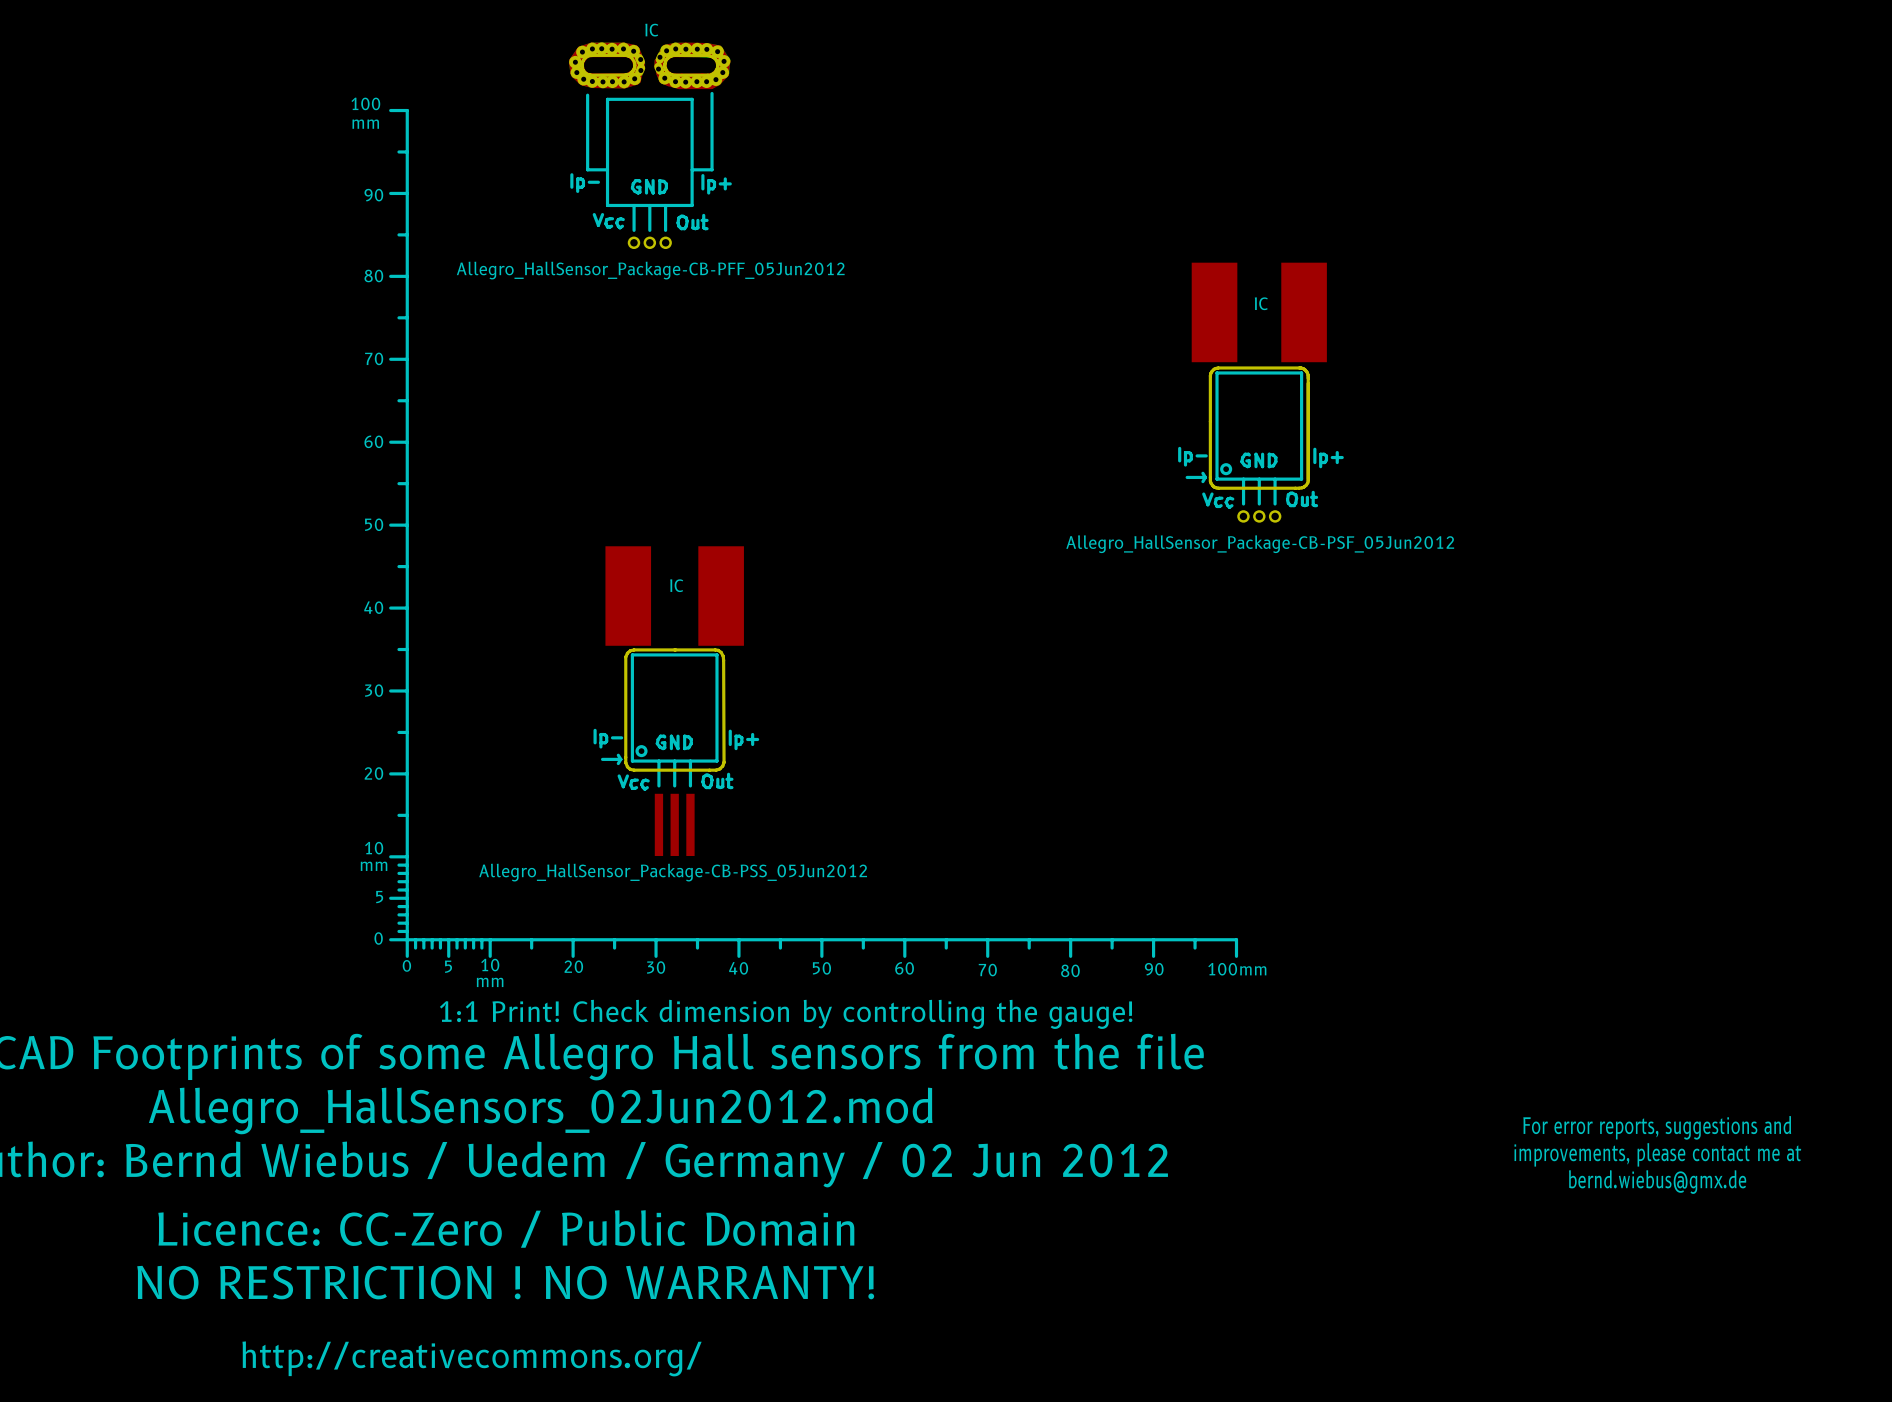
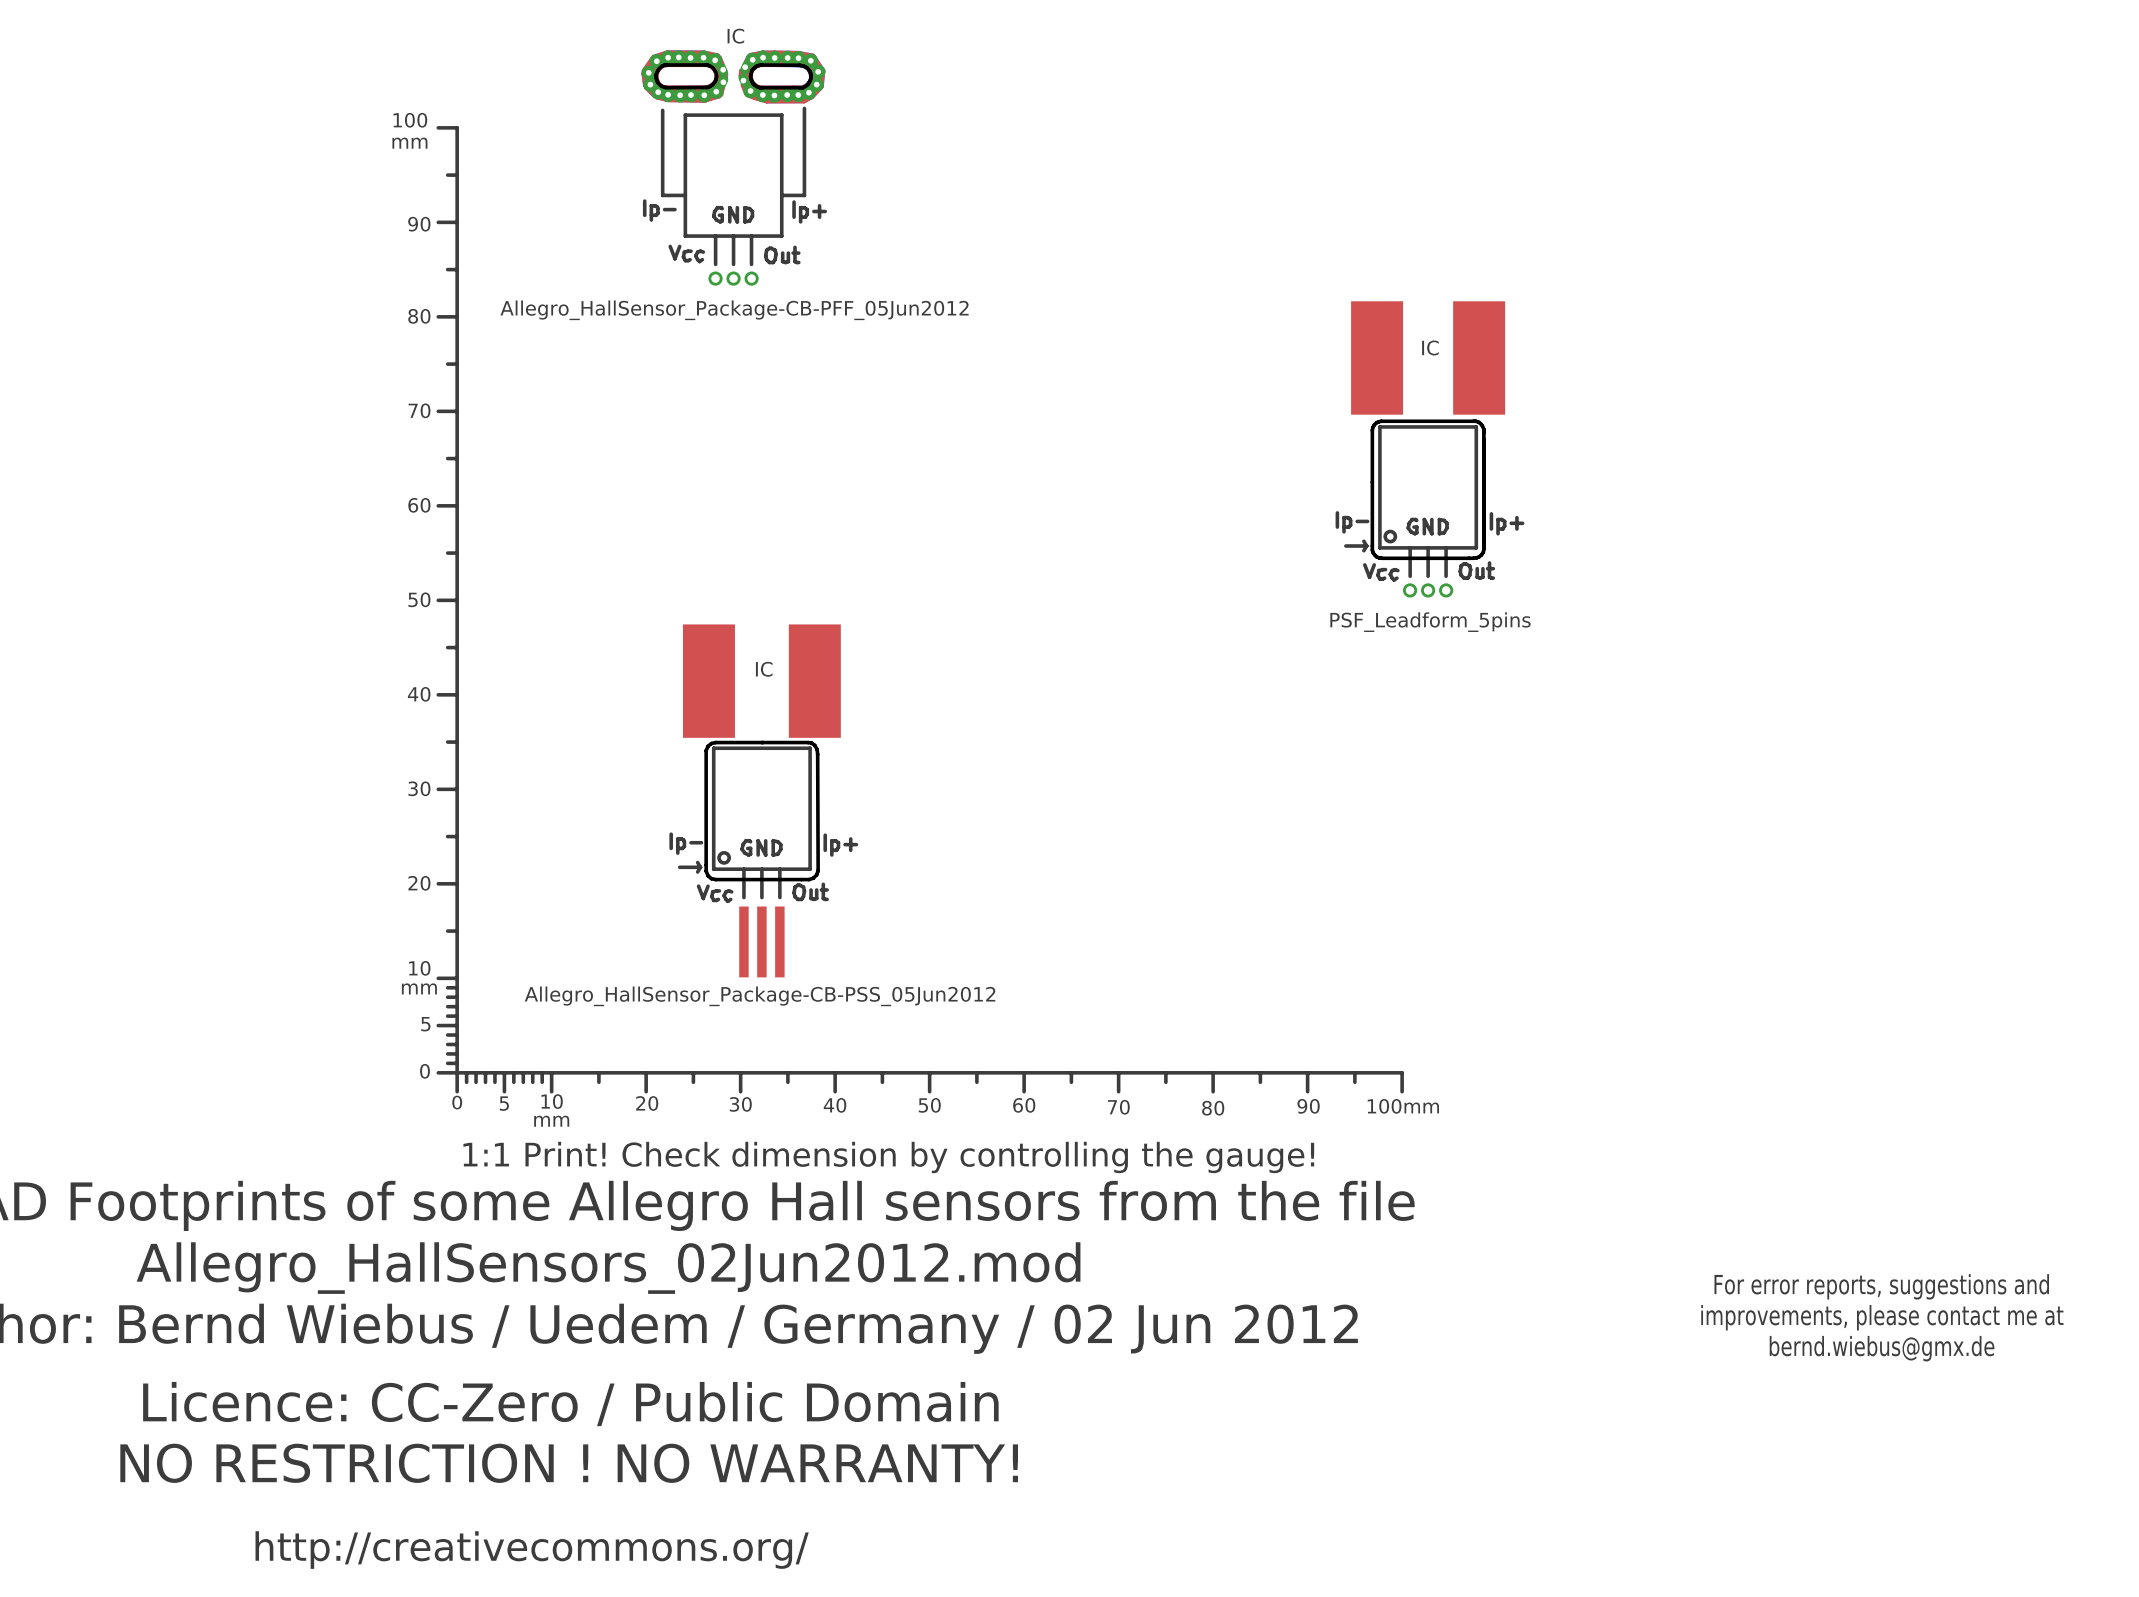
IC value: Allegro_HallSensor_Package-CB-PSF_05Jun2012 (1260, 544) -> PSF_Leadform_5pins (1430, 622)

